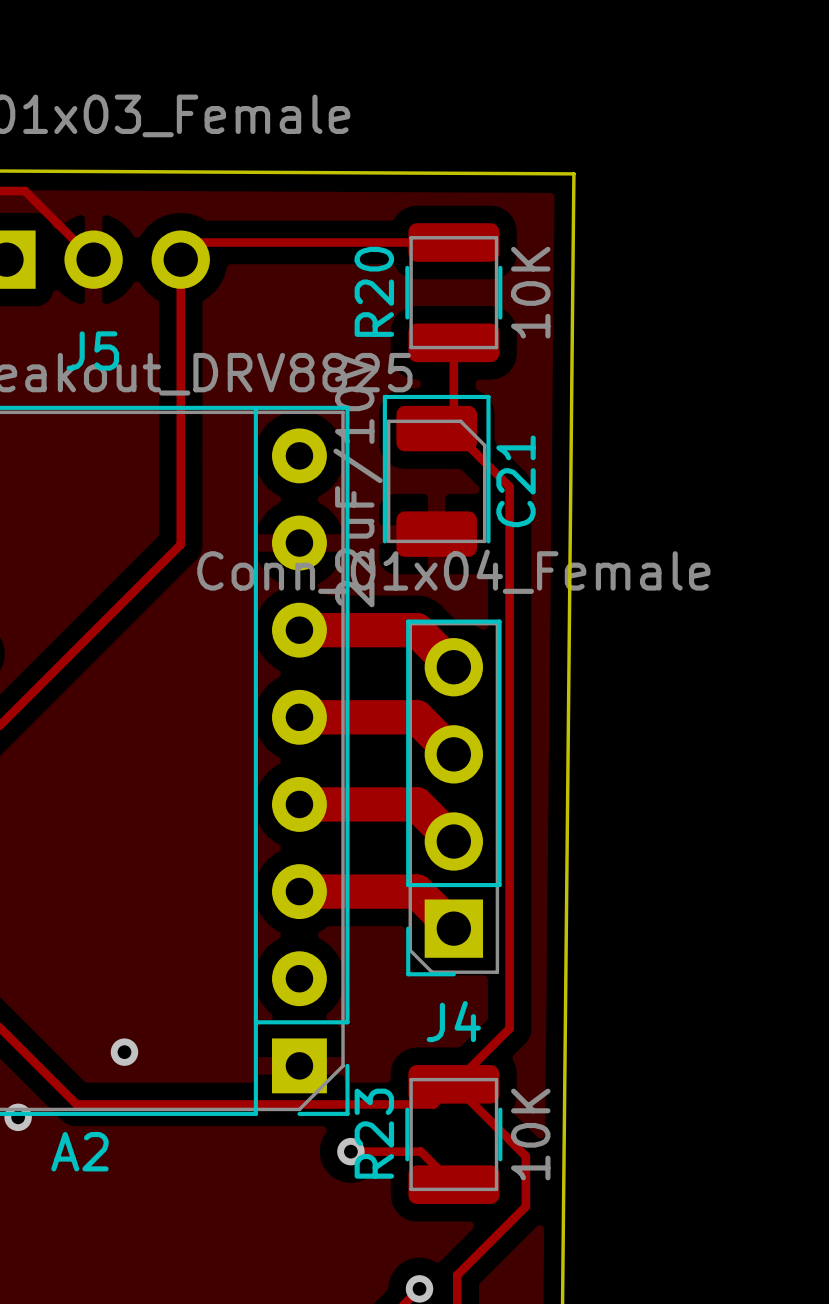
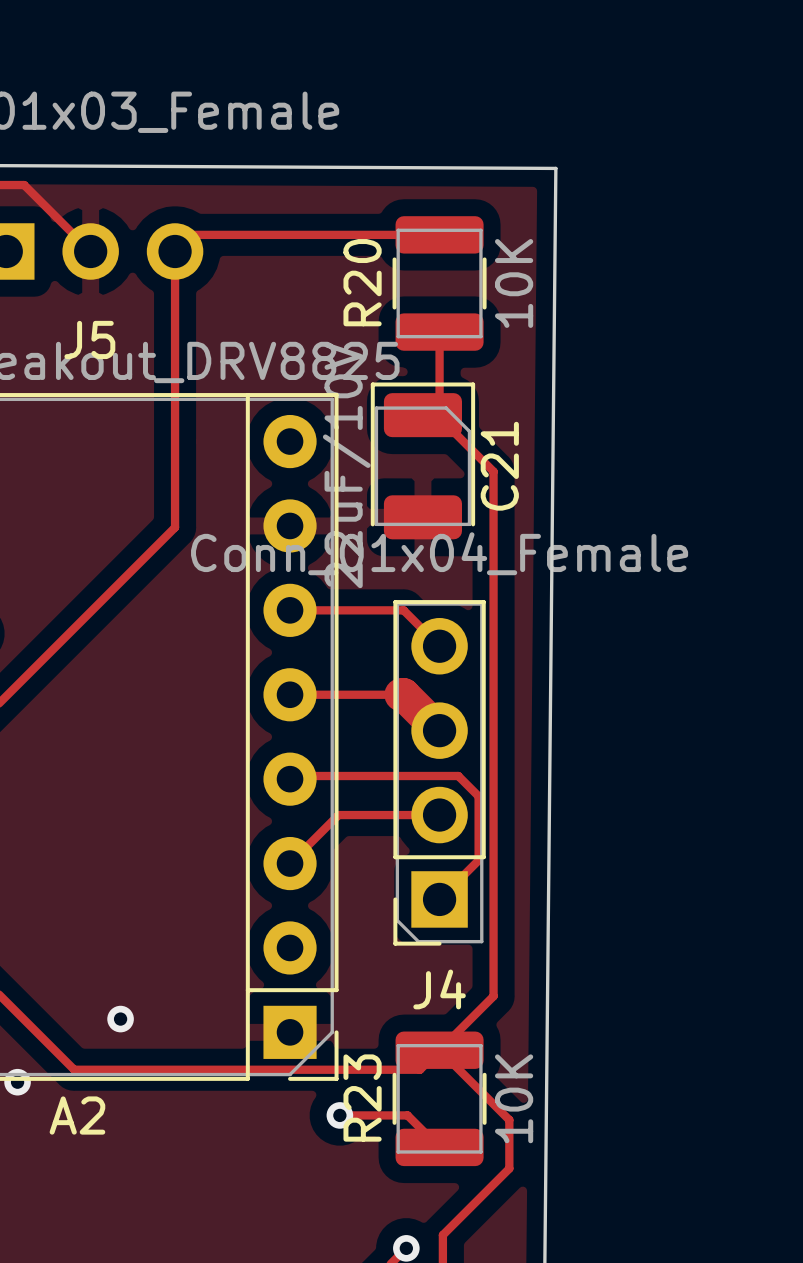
track width: thick (299, 630) (416, 630) (453, 667) -> thin (290, 610) (403, 610) (439, 646)
track width: thick (299, 717) (414, 717) -> thin (290, 694) (401, 694)
track: (299, 804) (416, 804) (453, 841) -> (290, 863) (338, 815) (439, 815)
track: (299, 891) (416, 891) (453, 928) -> (293, 776) (458, 776) (478, 796) (478, 860) (439, 899)

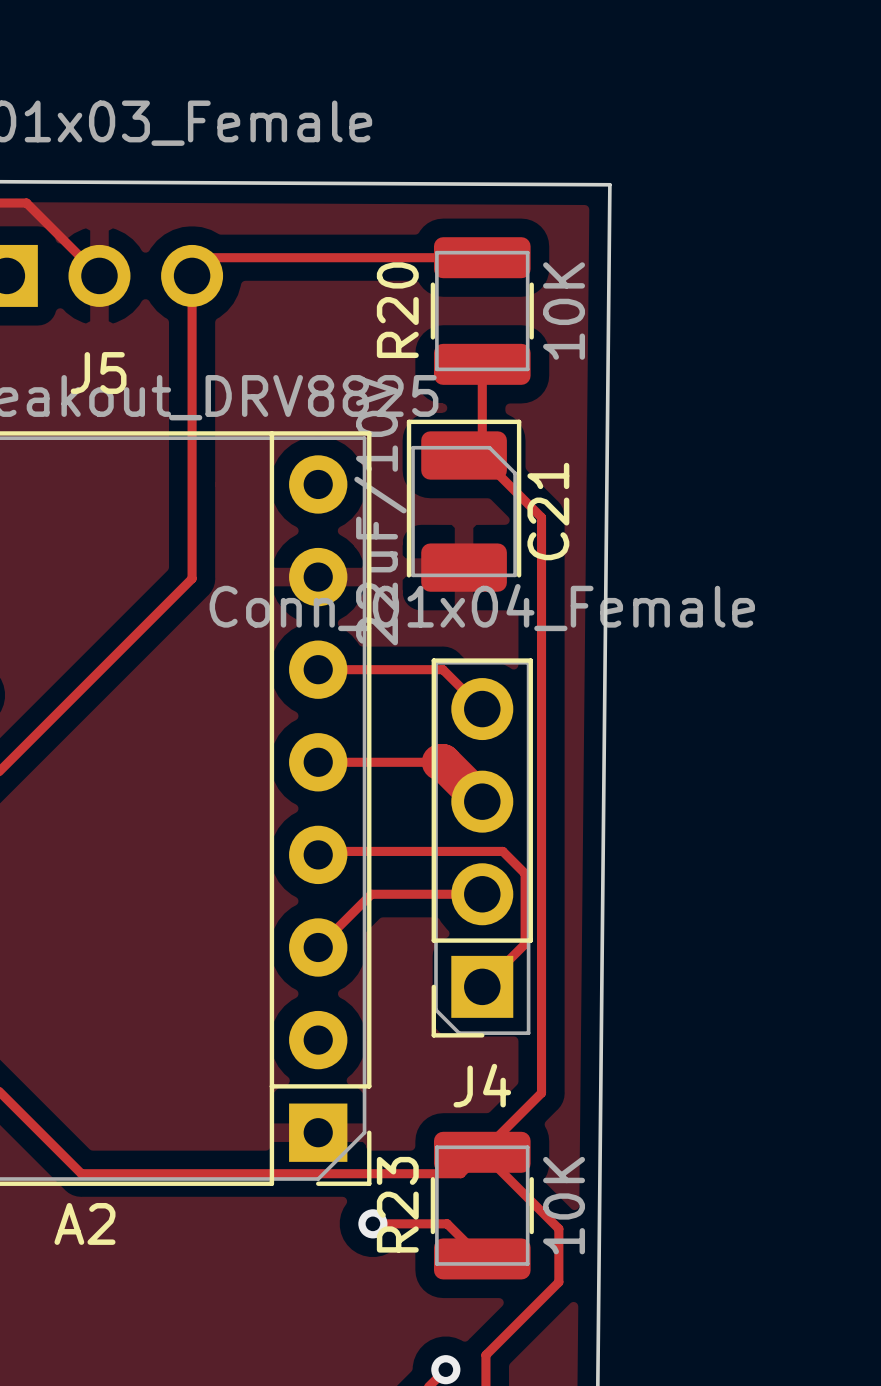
via: (120, 1019) -> none
via: (17, 1082) -> none

